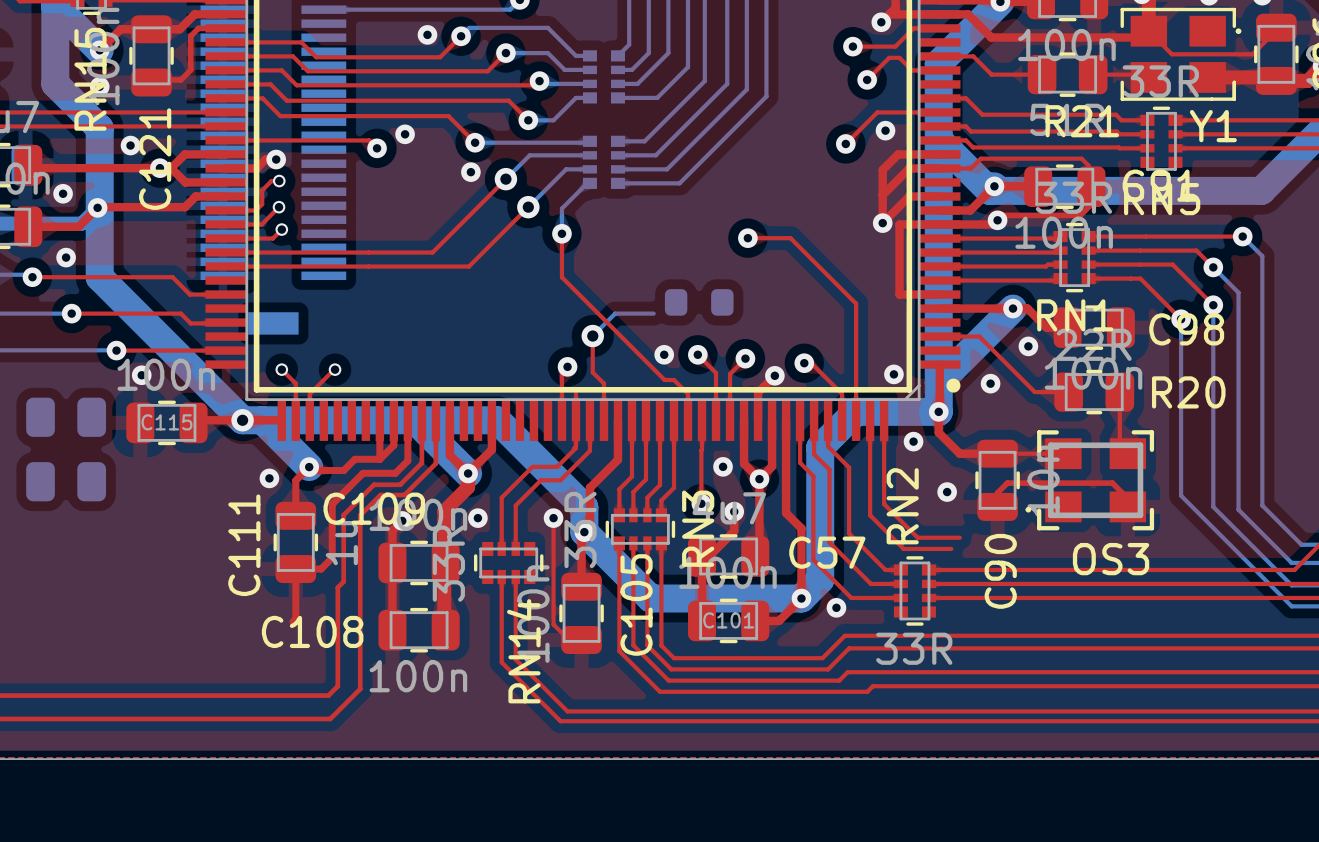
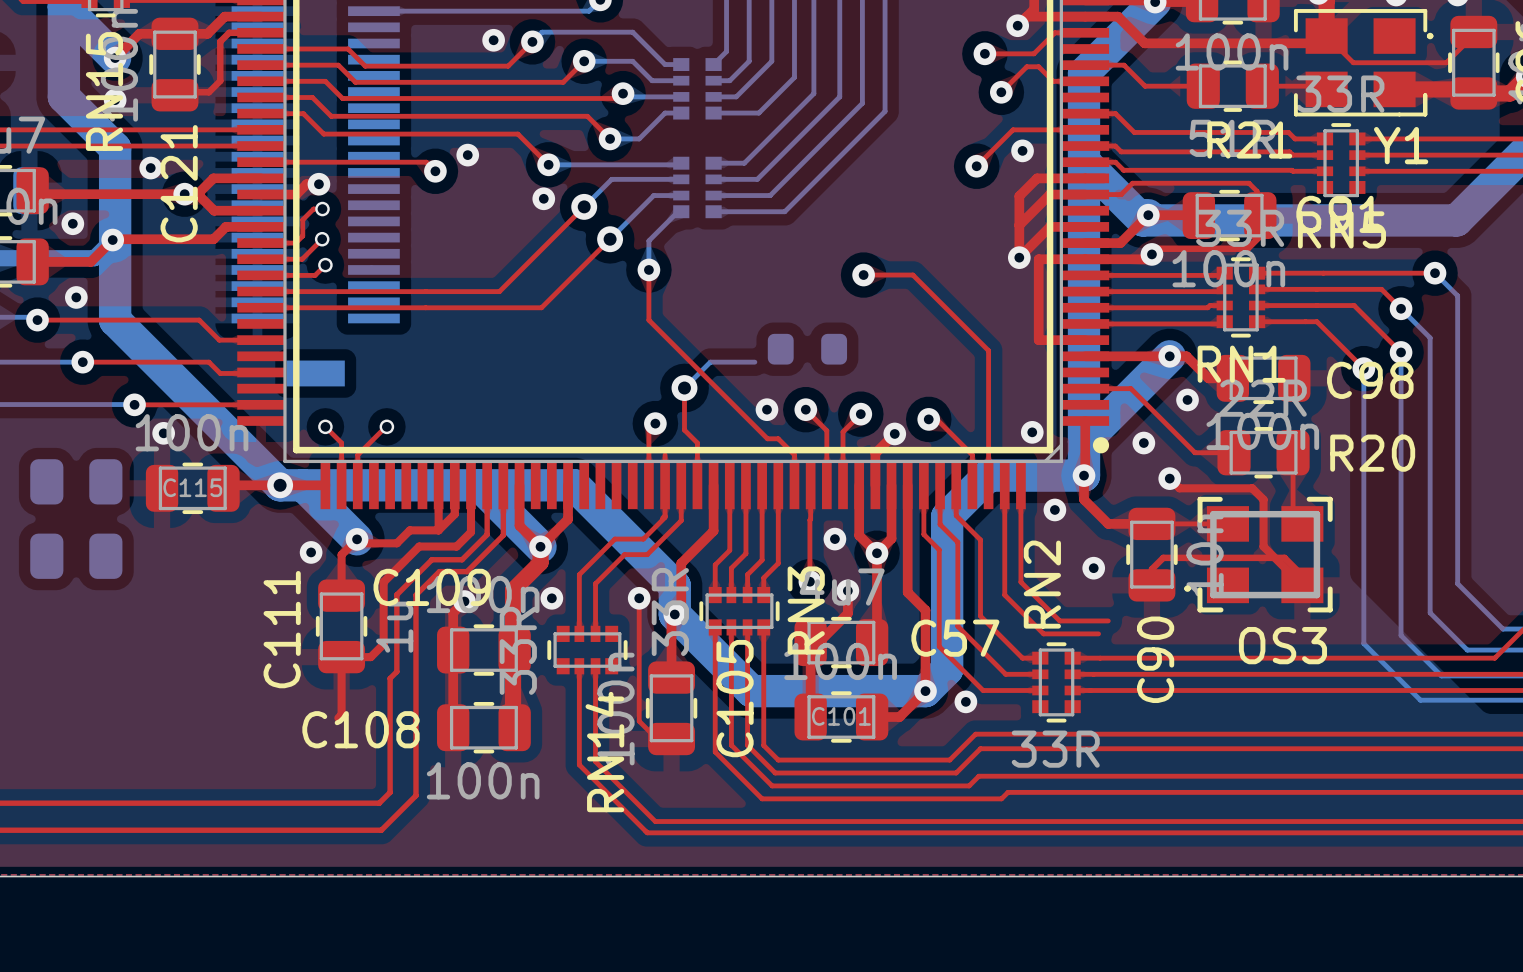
top track: none -> (1169, 478) (1179, 488) (1252, 488) (1263, 499) (1263, 546) (1302, 585)
via: none -> (1169, 478)
bottom track: (1181, 495) (1291, 606) -> (1363, 572) (1363, 643) (1420, 700) (1491, 700)
bottom track: (1213, 506) (1291, 585) -> (1401, 585) (1401, 635) (1441, 675) (1491, 675)
bottom track: (1238, 509) (1291, 562) -> (1430, 588) (1430, 612) (1467, 650) (1491, 650)

